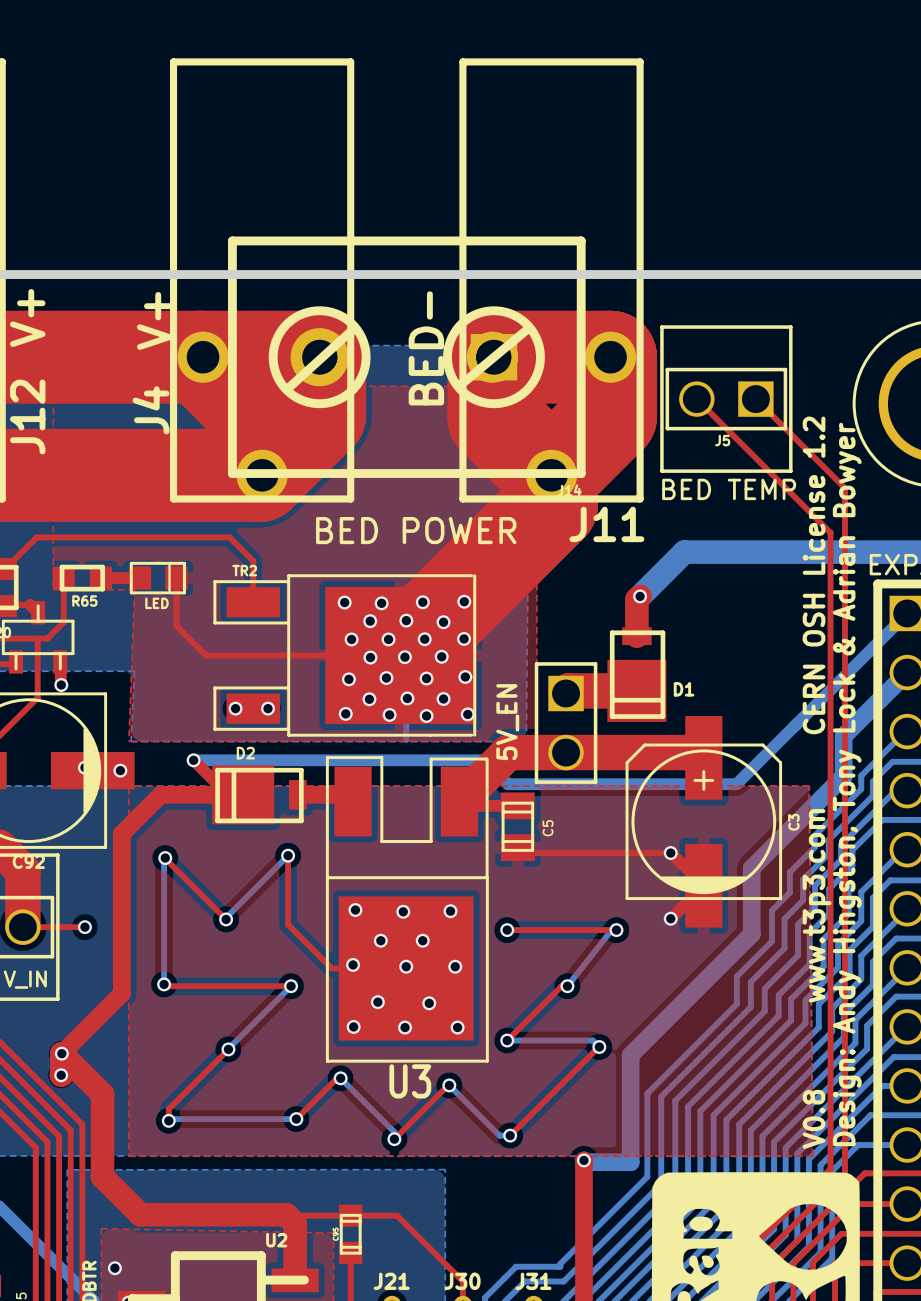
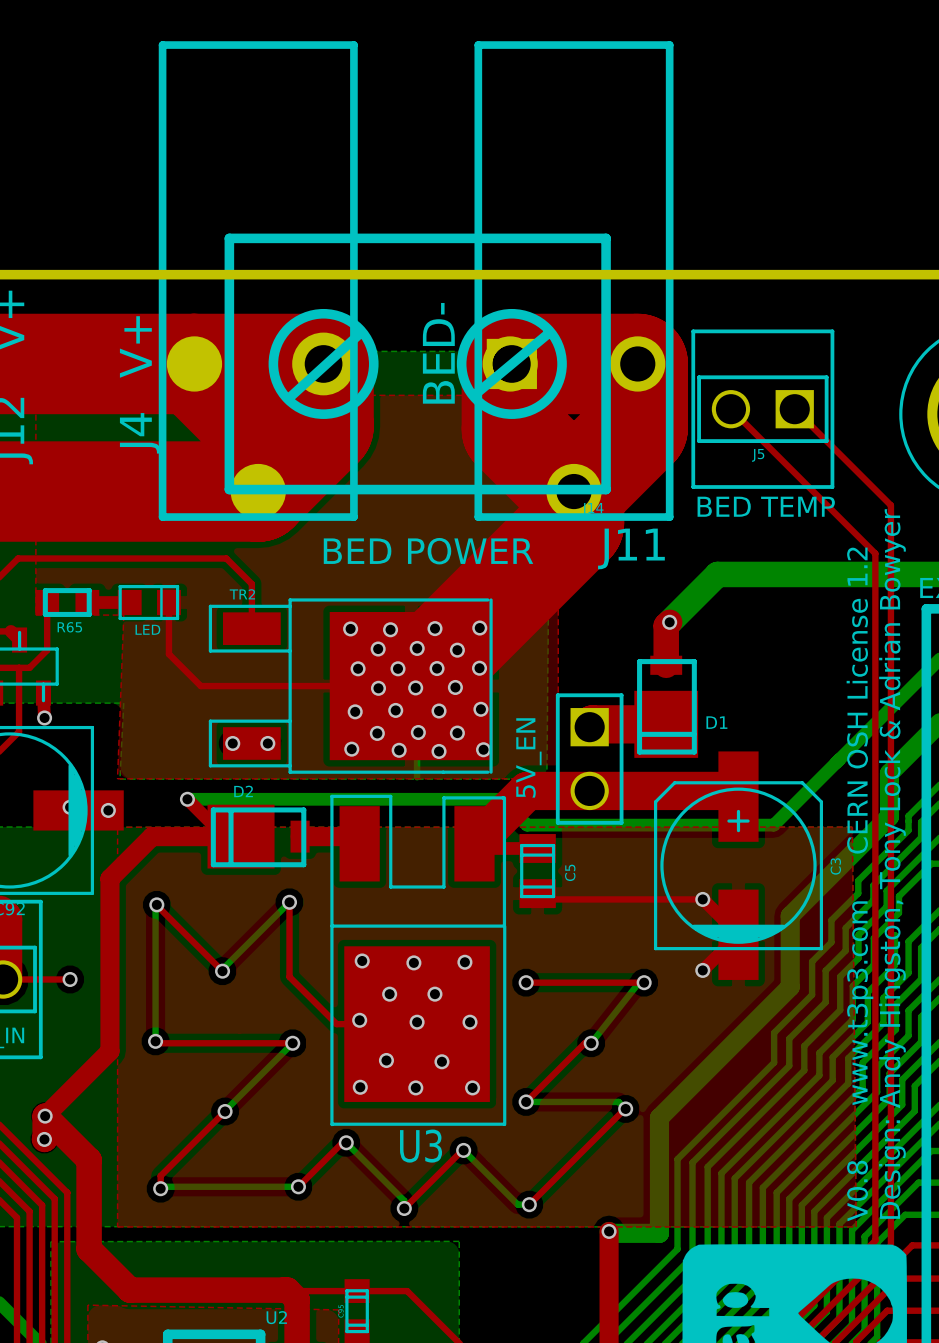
J4 footprint: [169, 58, 355, 503] -> [158, 41, 358, 521]

